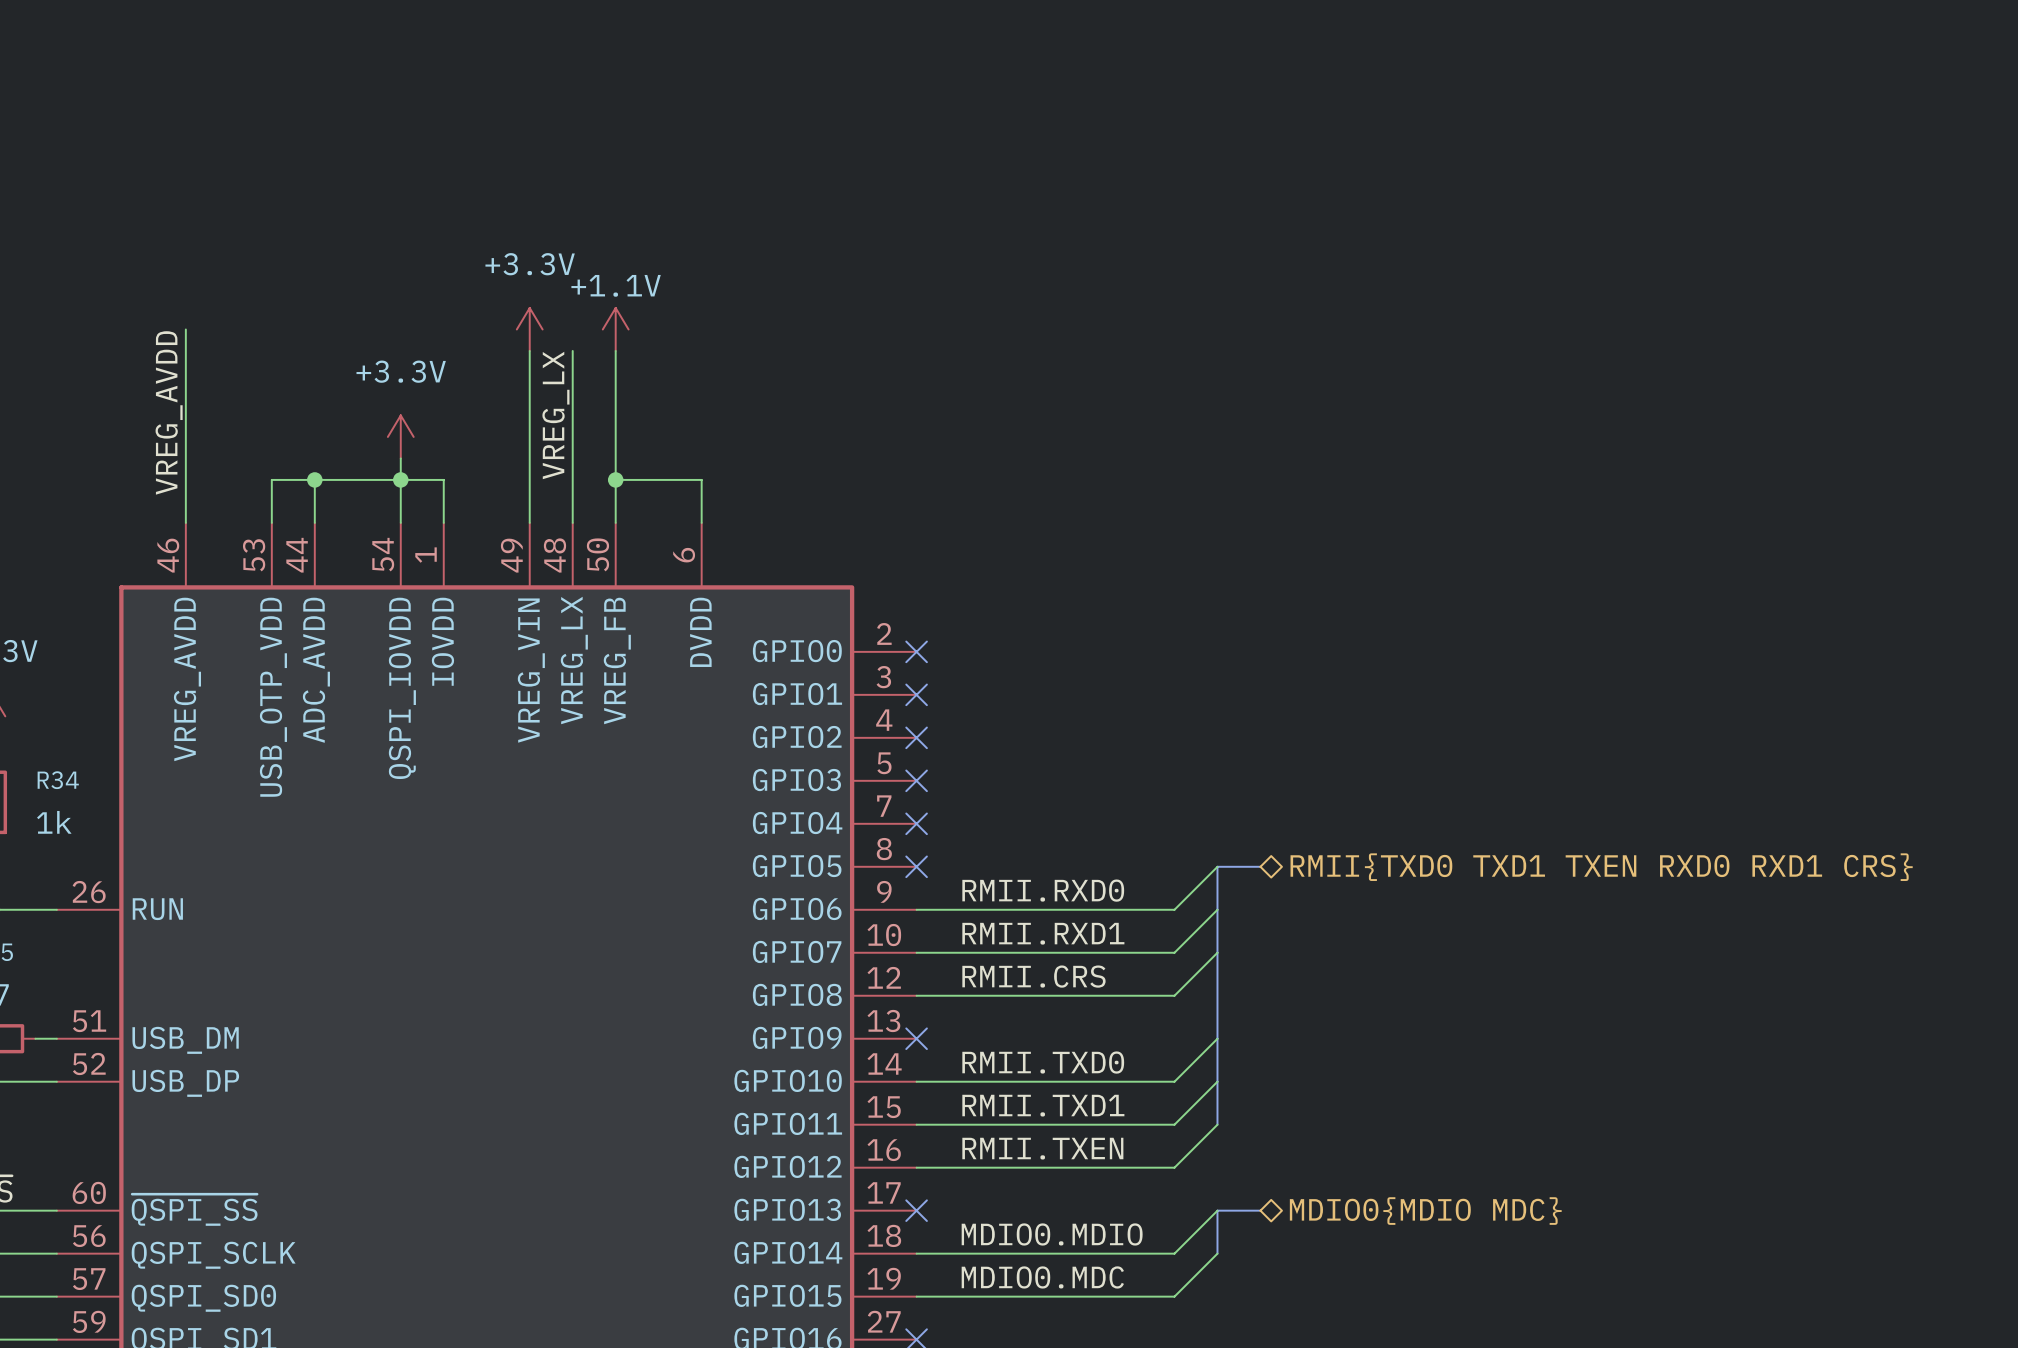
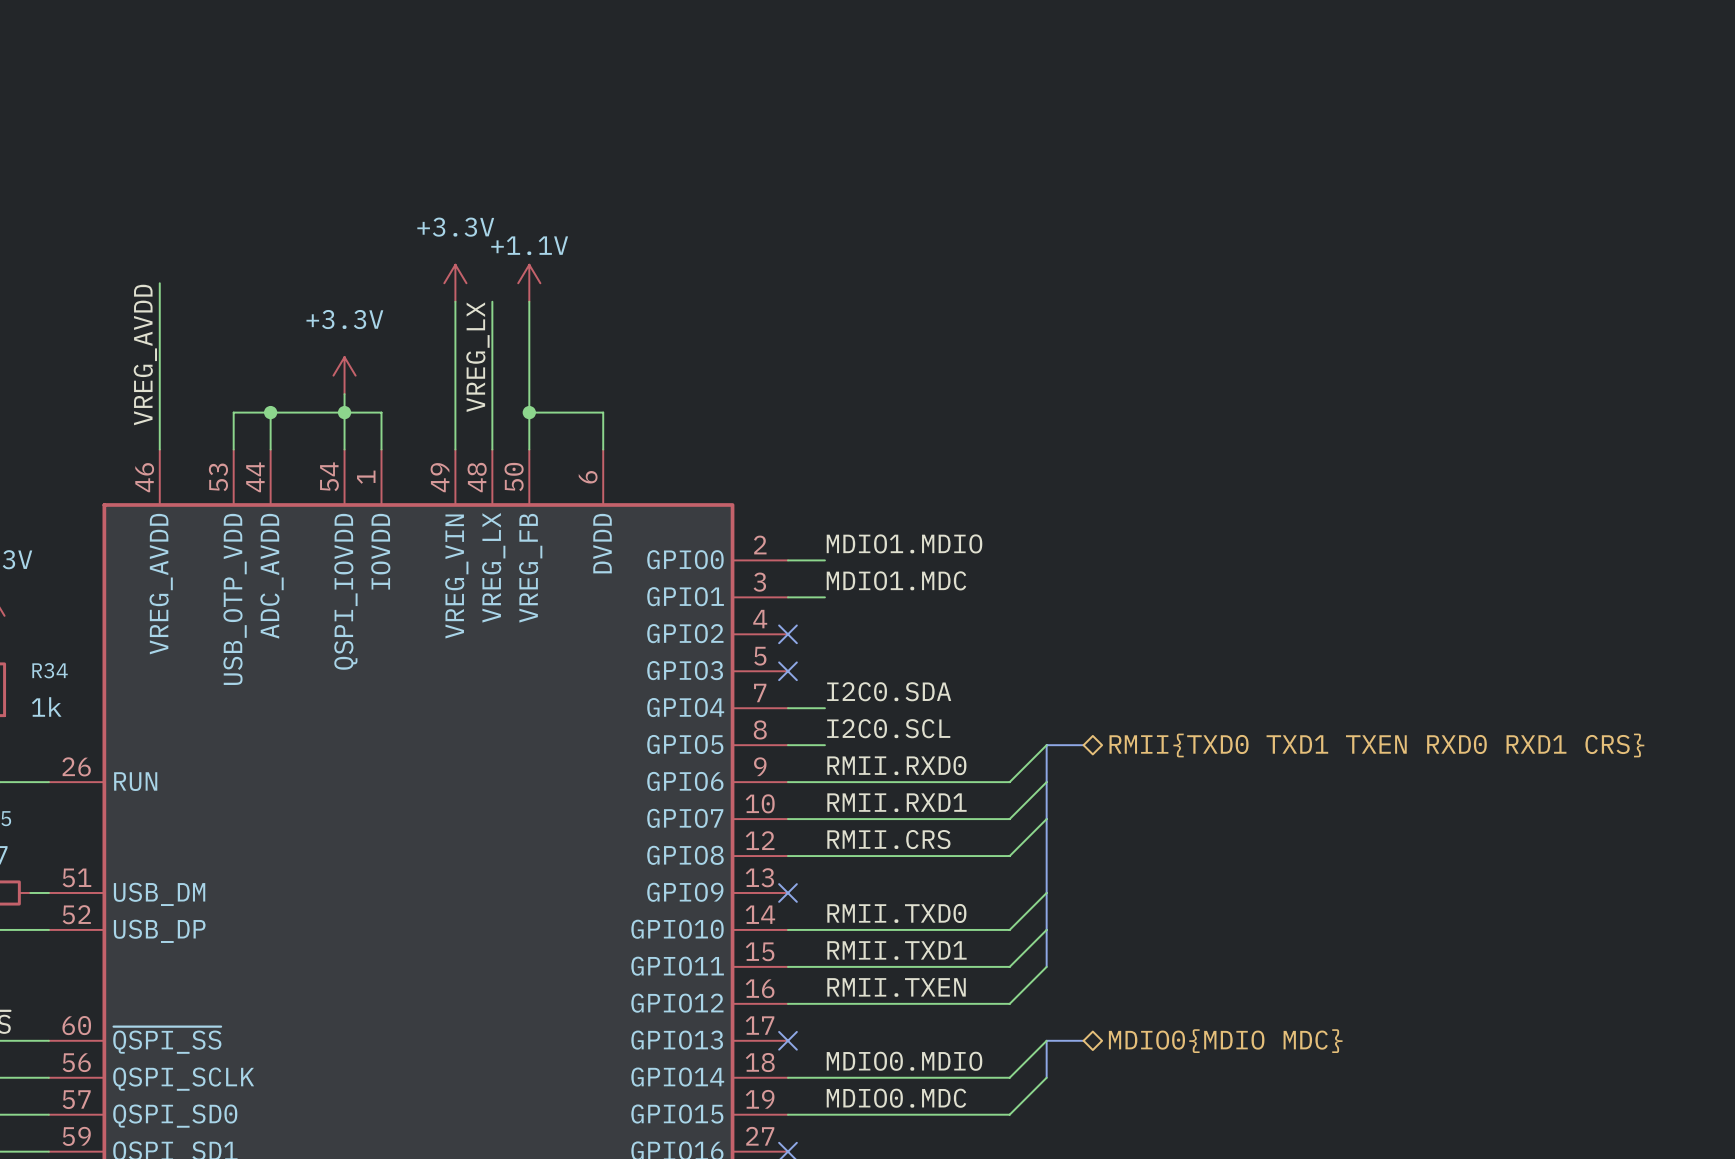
label: none -> MDIO1.MDIO (904, 543)
wire: none -> (787, 560) (824, 560)
no-connect mark: (916, 651) -> none
label: none -> MDIO1.MDC (896, 580)
wire: none -> (787, 597) (824, 597)
no-connect mark: (916, 694) -> none
label: none -> I2C0.SDA (889, 691)
wire: none -> (787, 708) (824, 708)
no-connect mark: (916, 823) -> none
label: none -> I2C0.SCL (888, 728)
wire: none -> (787, 745) (824, 745)
no-connect mark: (916, 866) -> none

